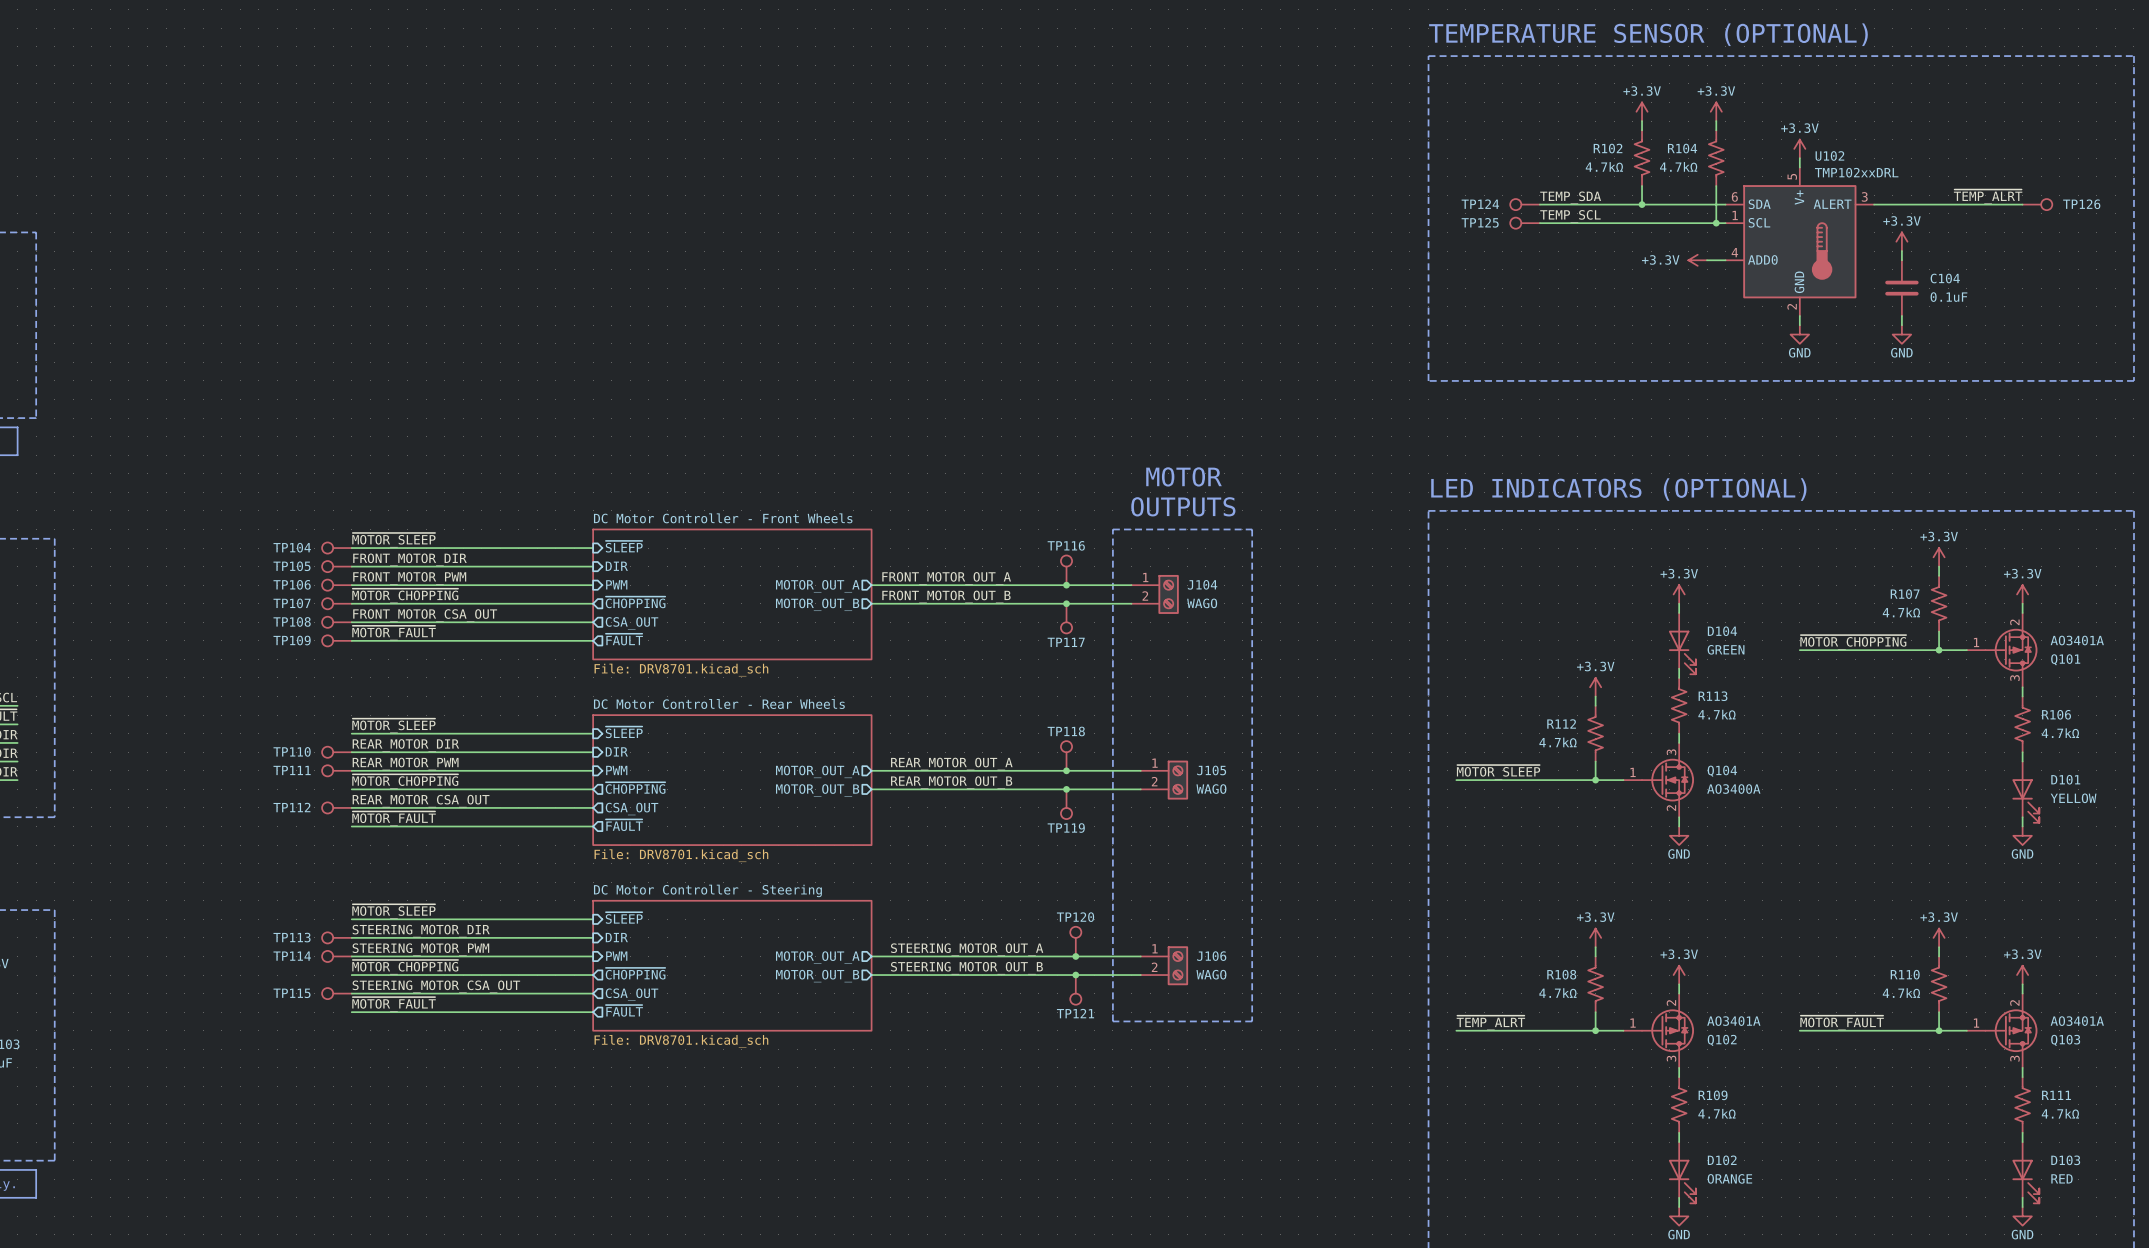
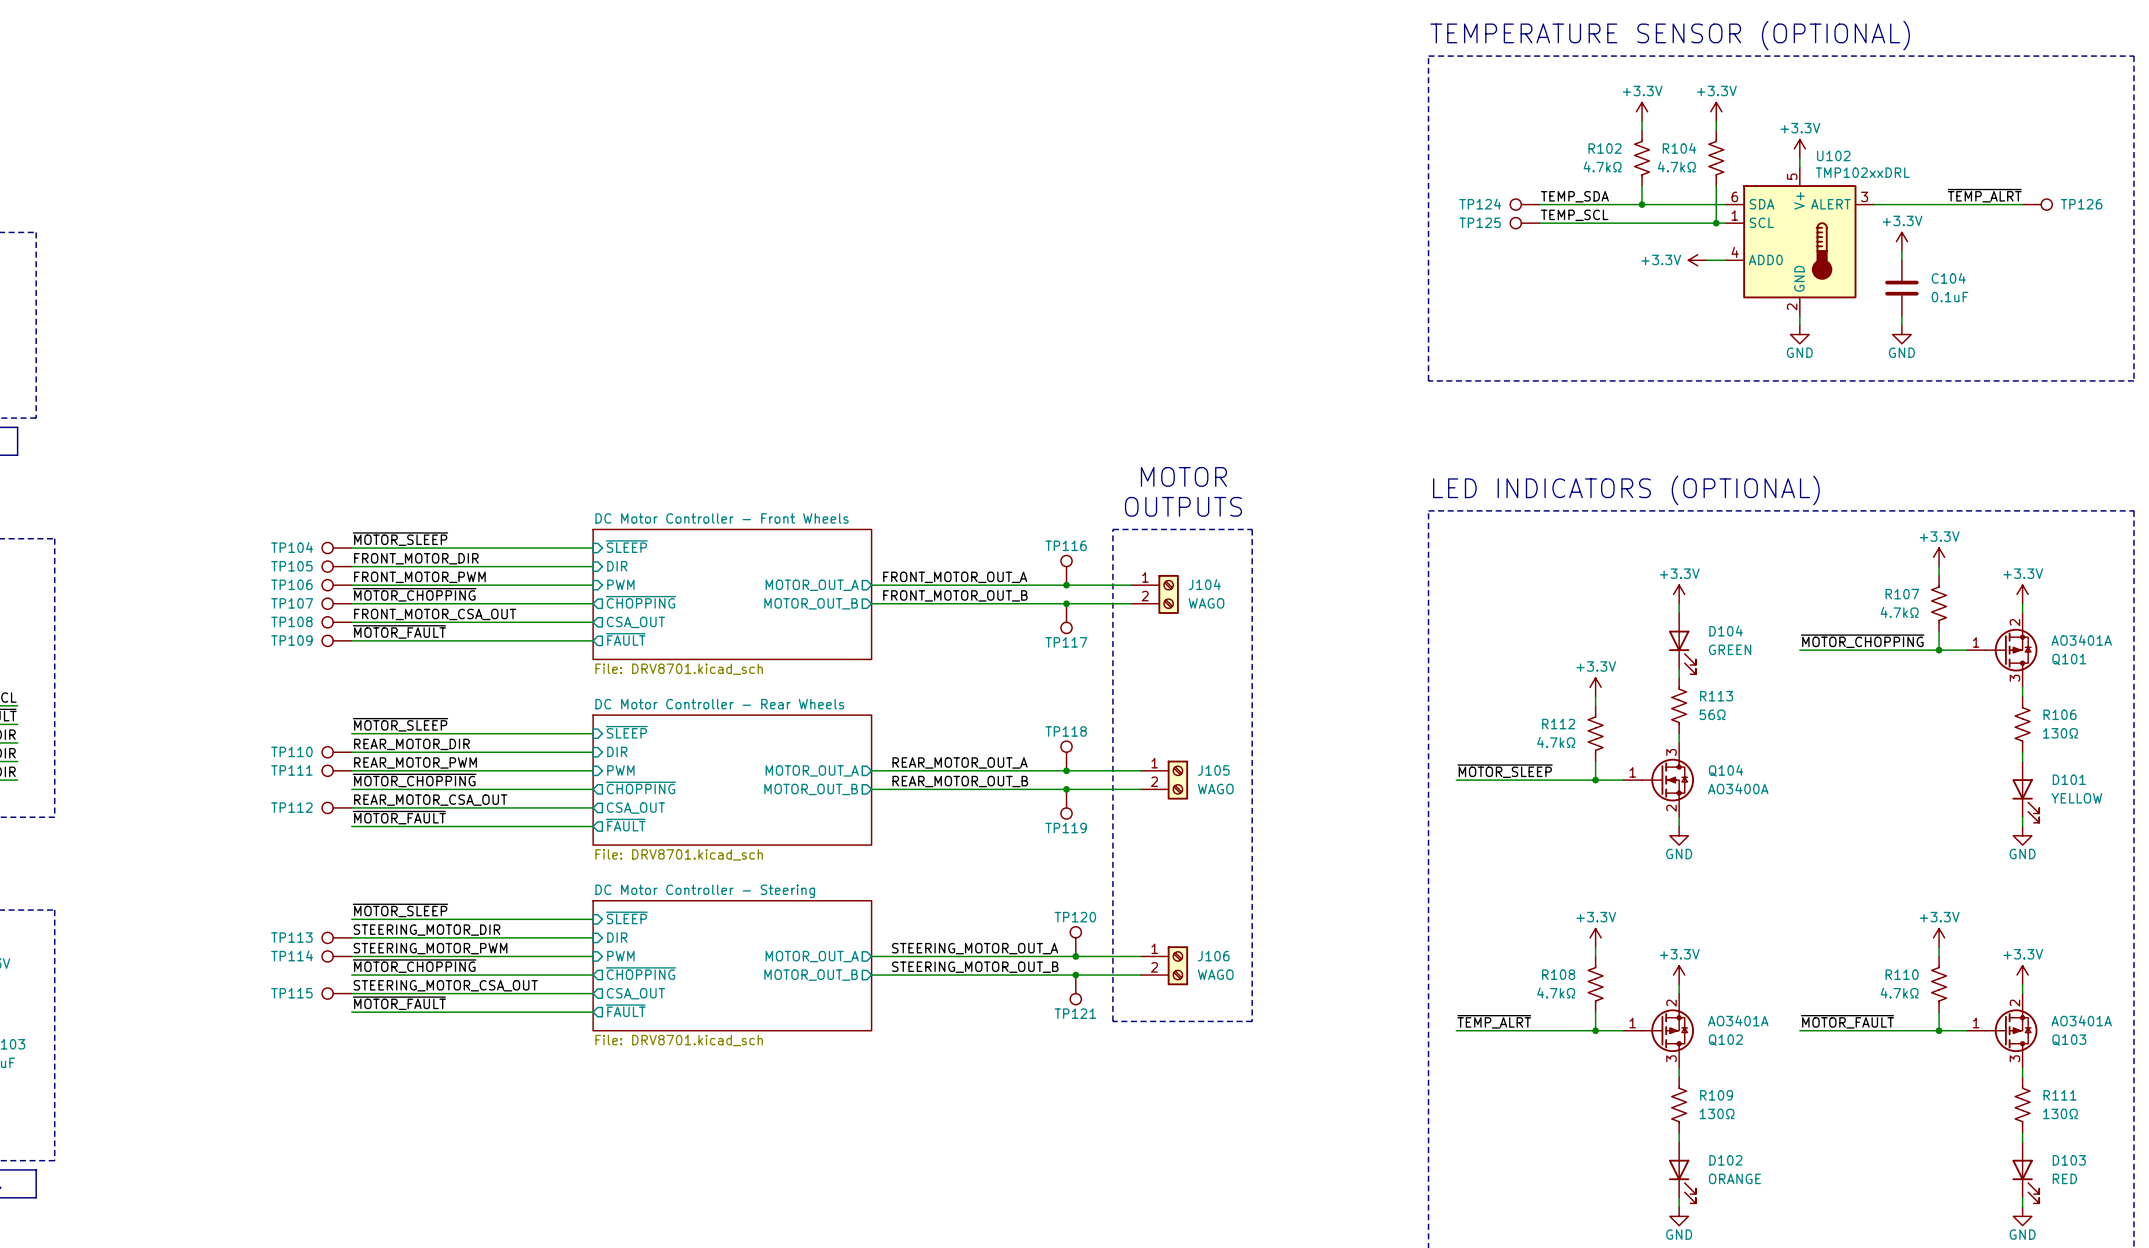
R113 value: 4.7kΩ (1716, 714) -> 56Ω (1712, 714)
R106 value: 4.7kΩ (2060, 733) -> 130Ω (2060, 733)
R109 value: 4.7kΩ (1716, 1113) -> 130Ω (1717, 1113)
R111 value: 4.7kΩ (2060, 1113) -> 130Ω (2060, 1113)

